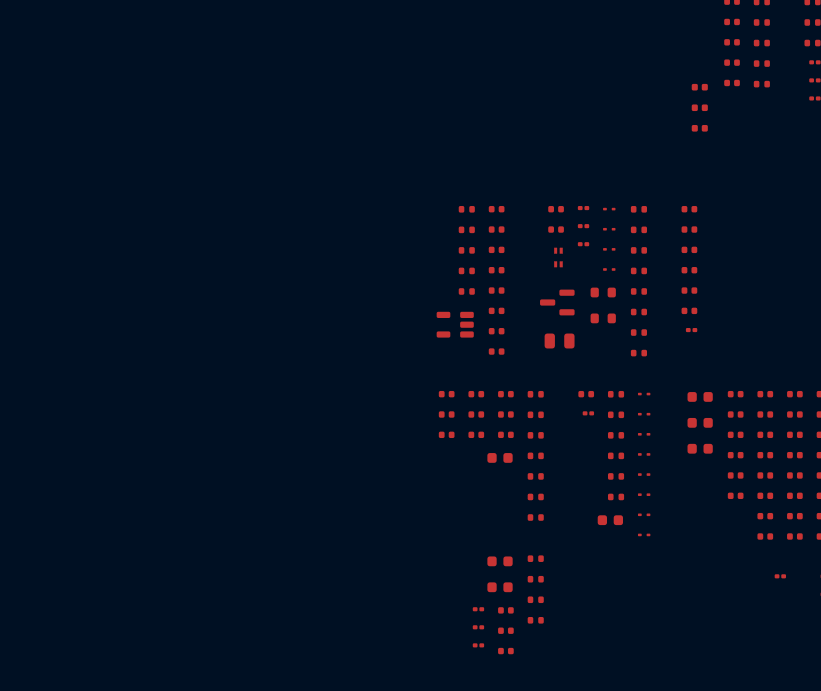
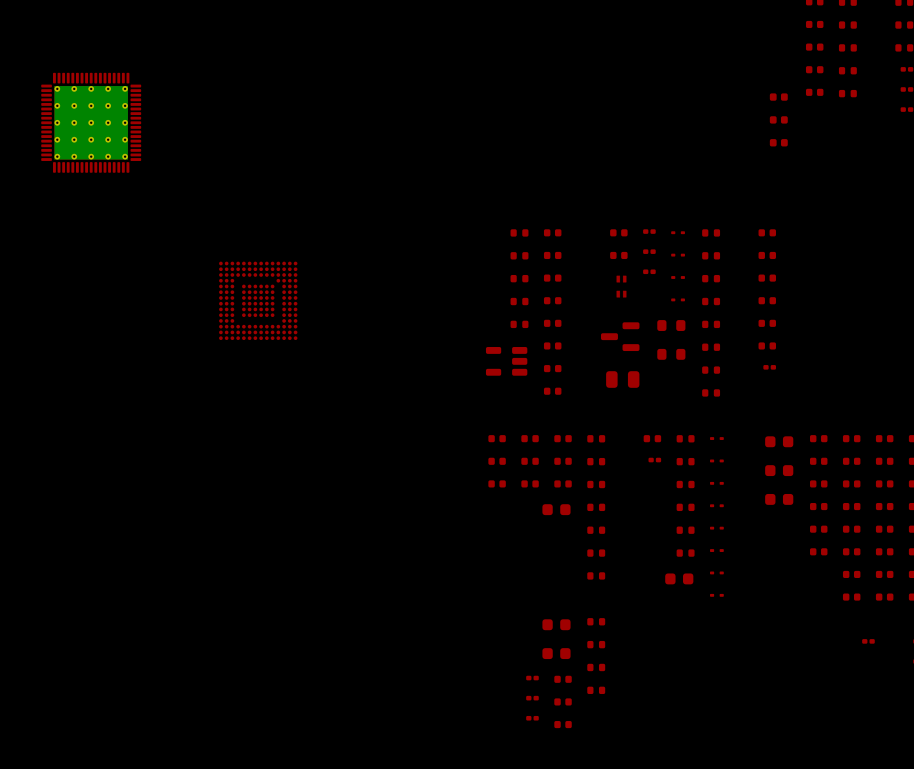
part: none -> (91, 122)
part: none -> (258, 300)

